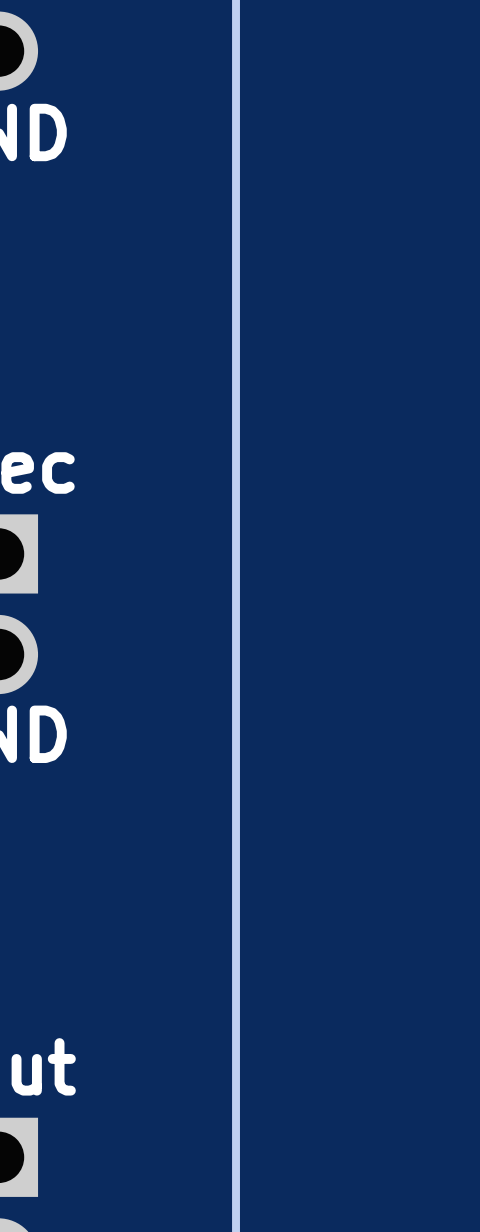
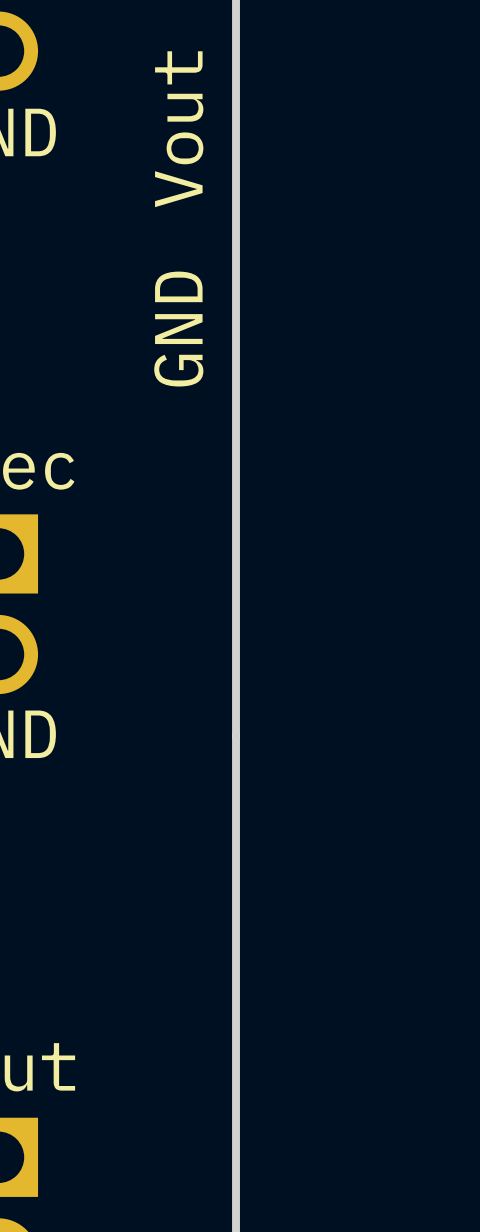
text: none -> Vout (179, 129)
text: none -> GND (178, 329)

